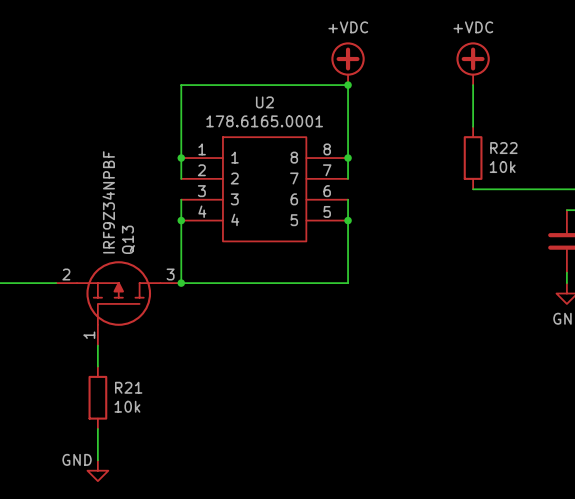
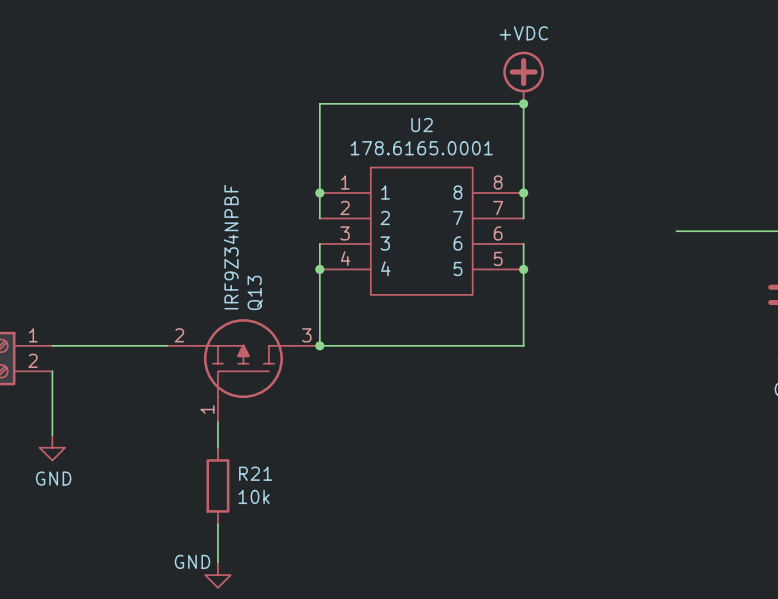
power symbol: +VDC (473, 63) -> none
wire: (473, 85) (473, 126) -> none
R22: 10k (473, 158) -> none

